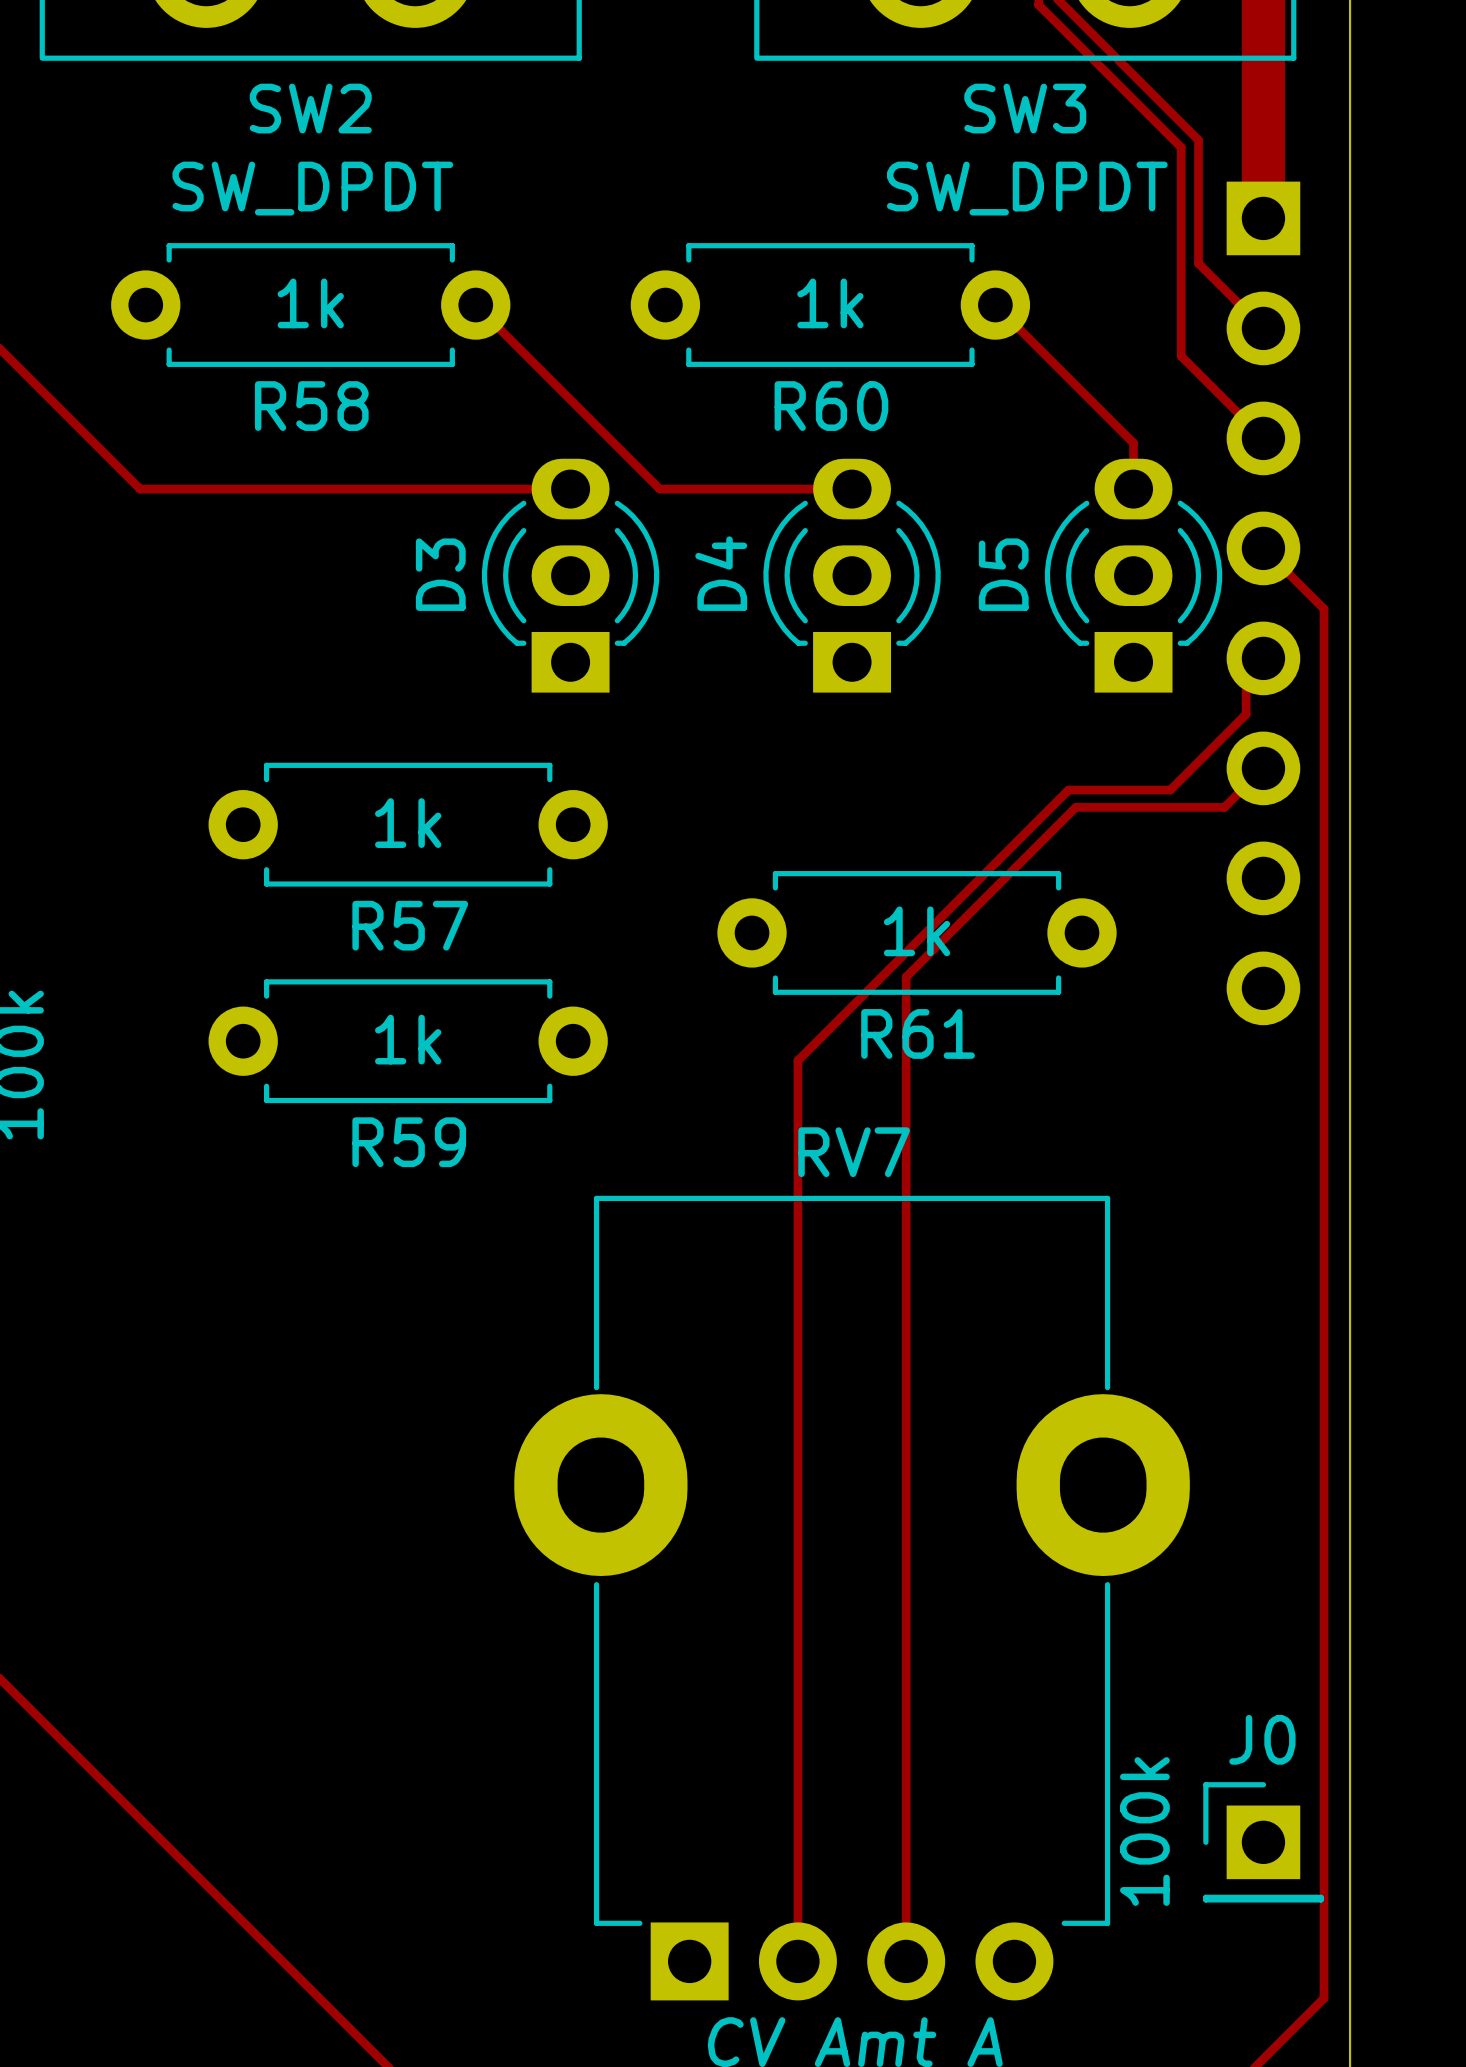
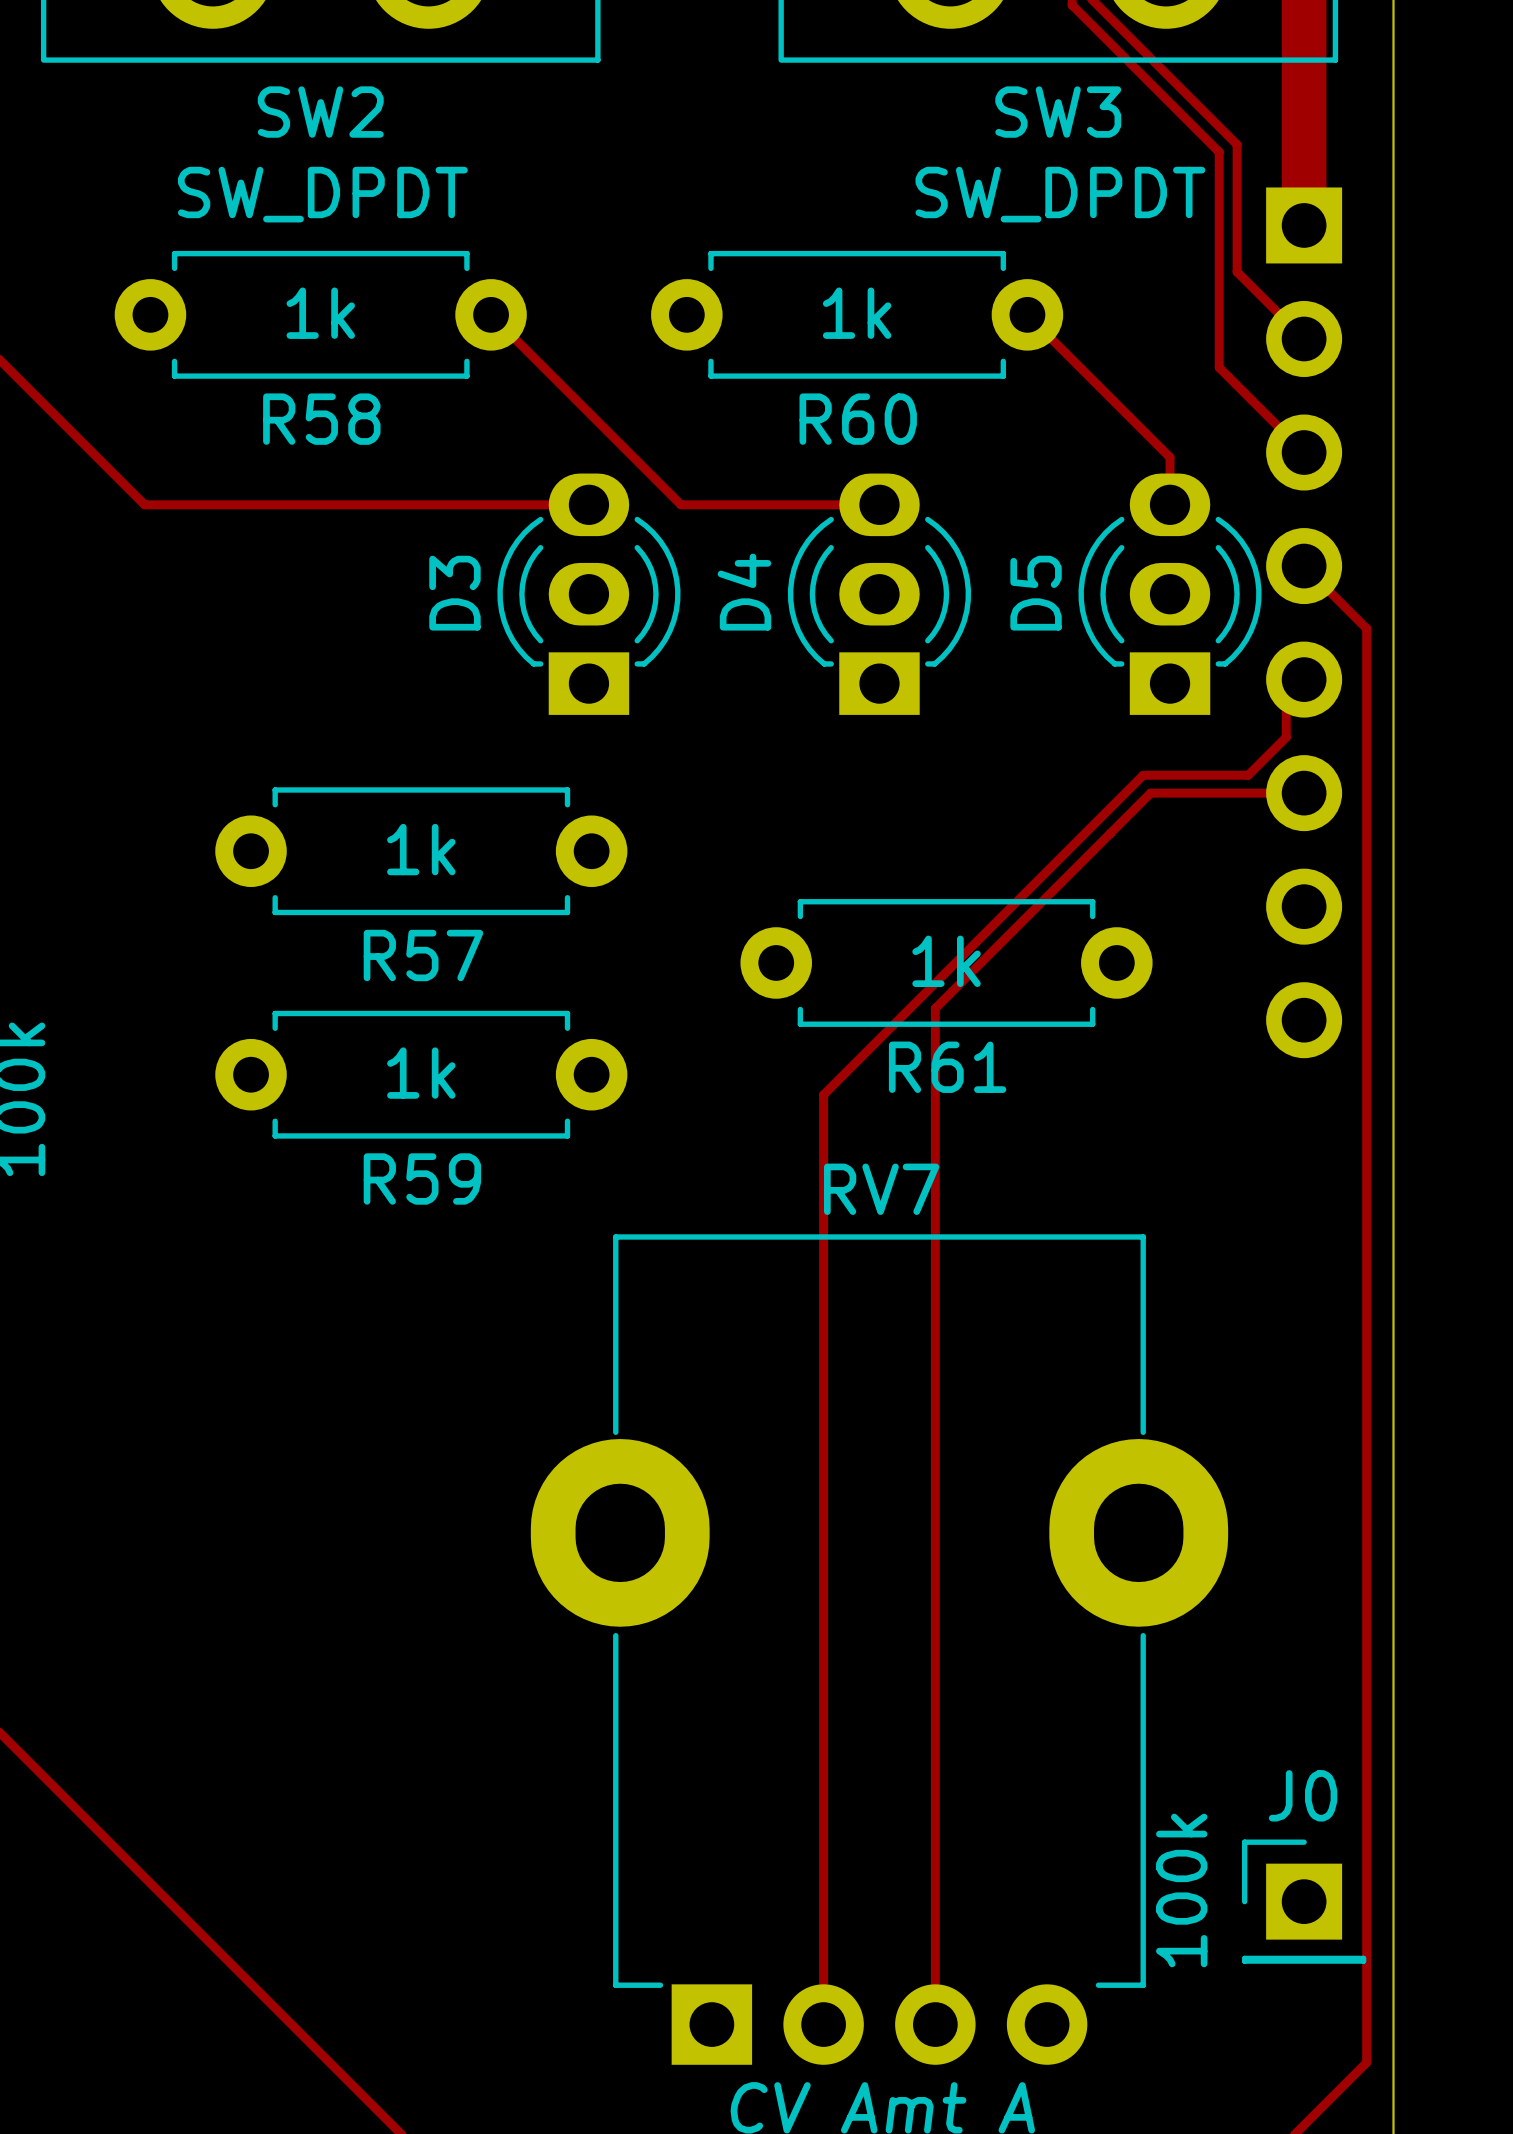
track: (1209, 751) (1170, 790) (1068, 790) -> (1248, 775) (1143, 775) (1102, 815)
track: (1263, 768) (1224, 807) (1075, 807) -> (1304, 793) (1150, 793) (1110, 833)

